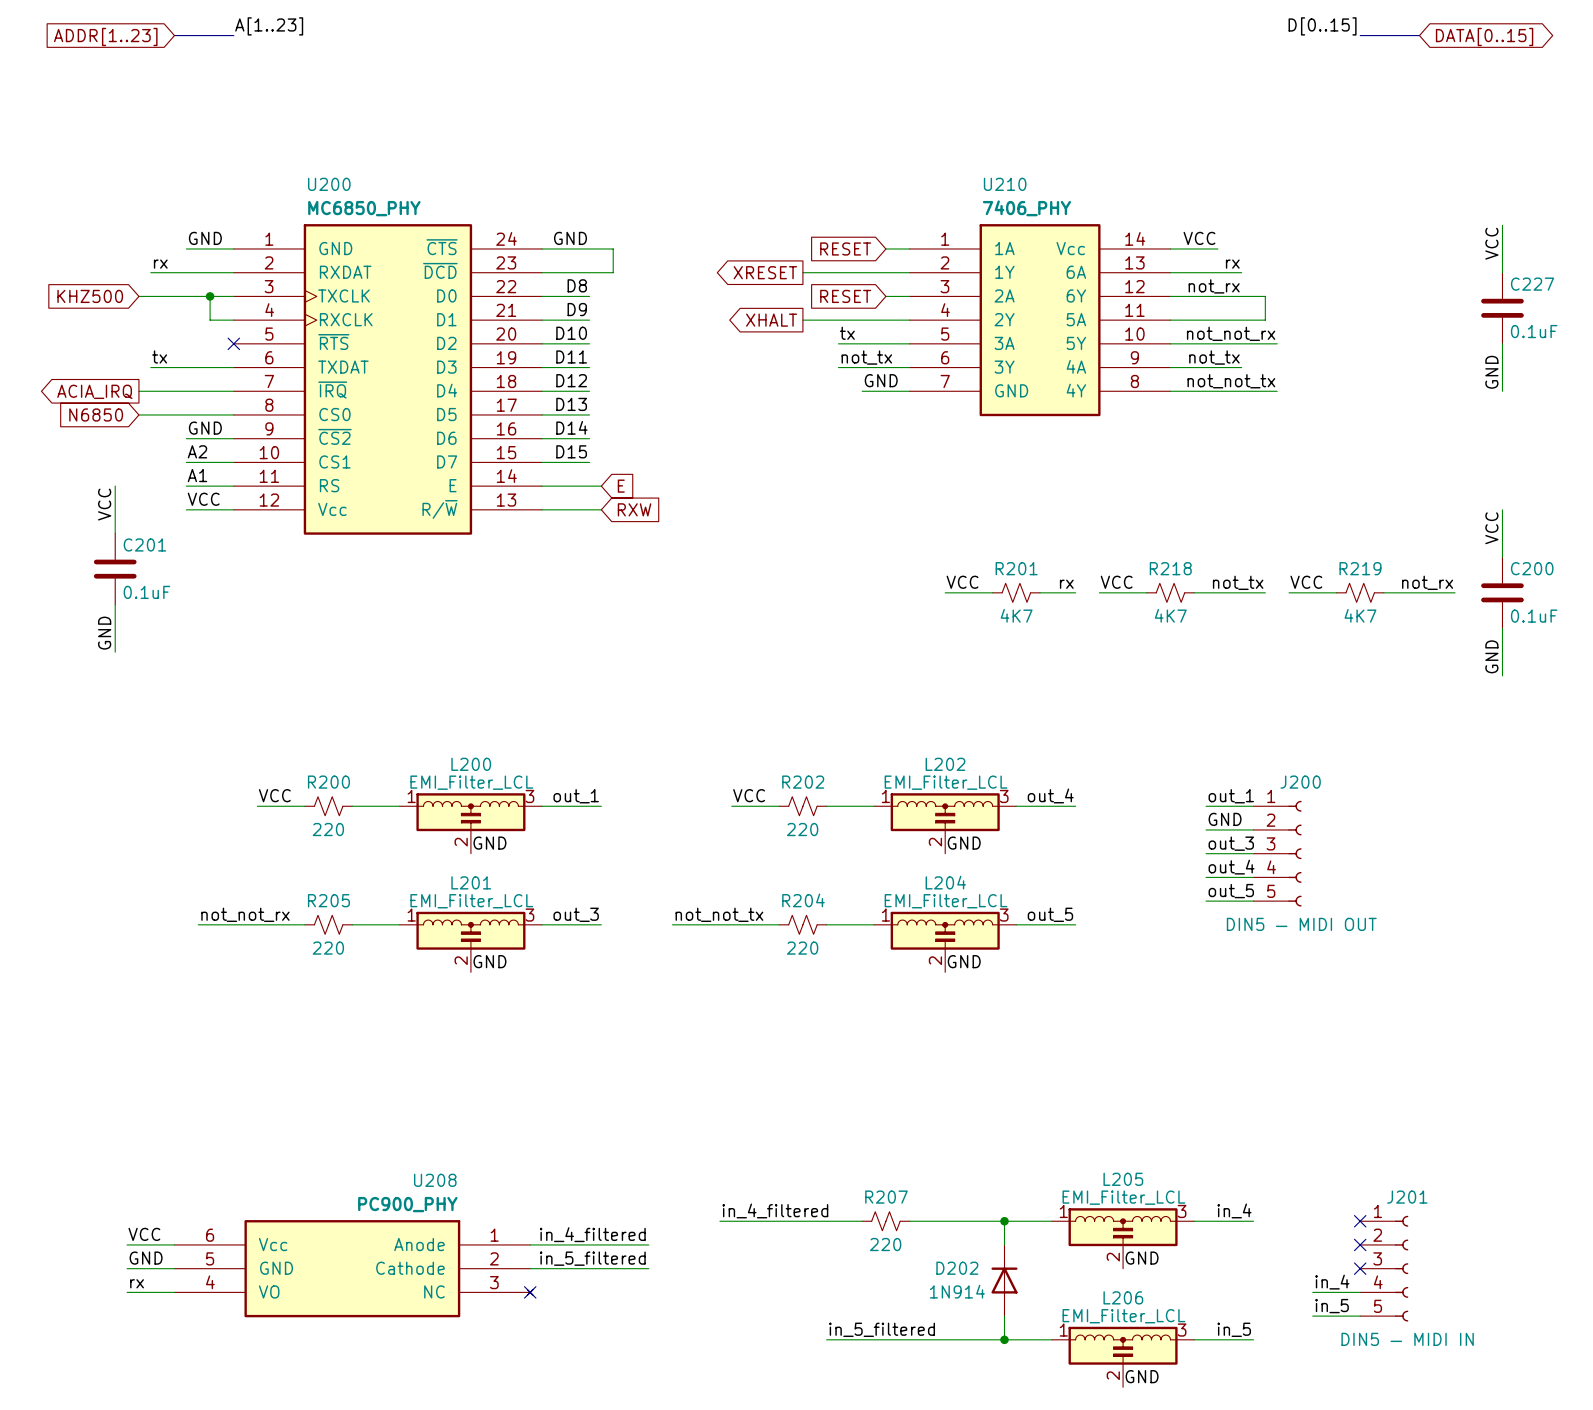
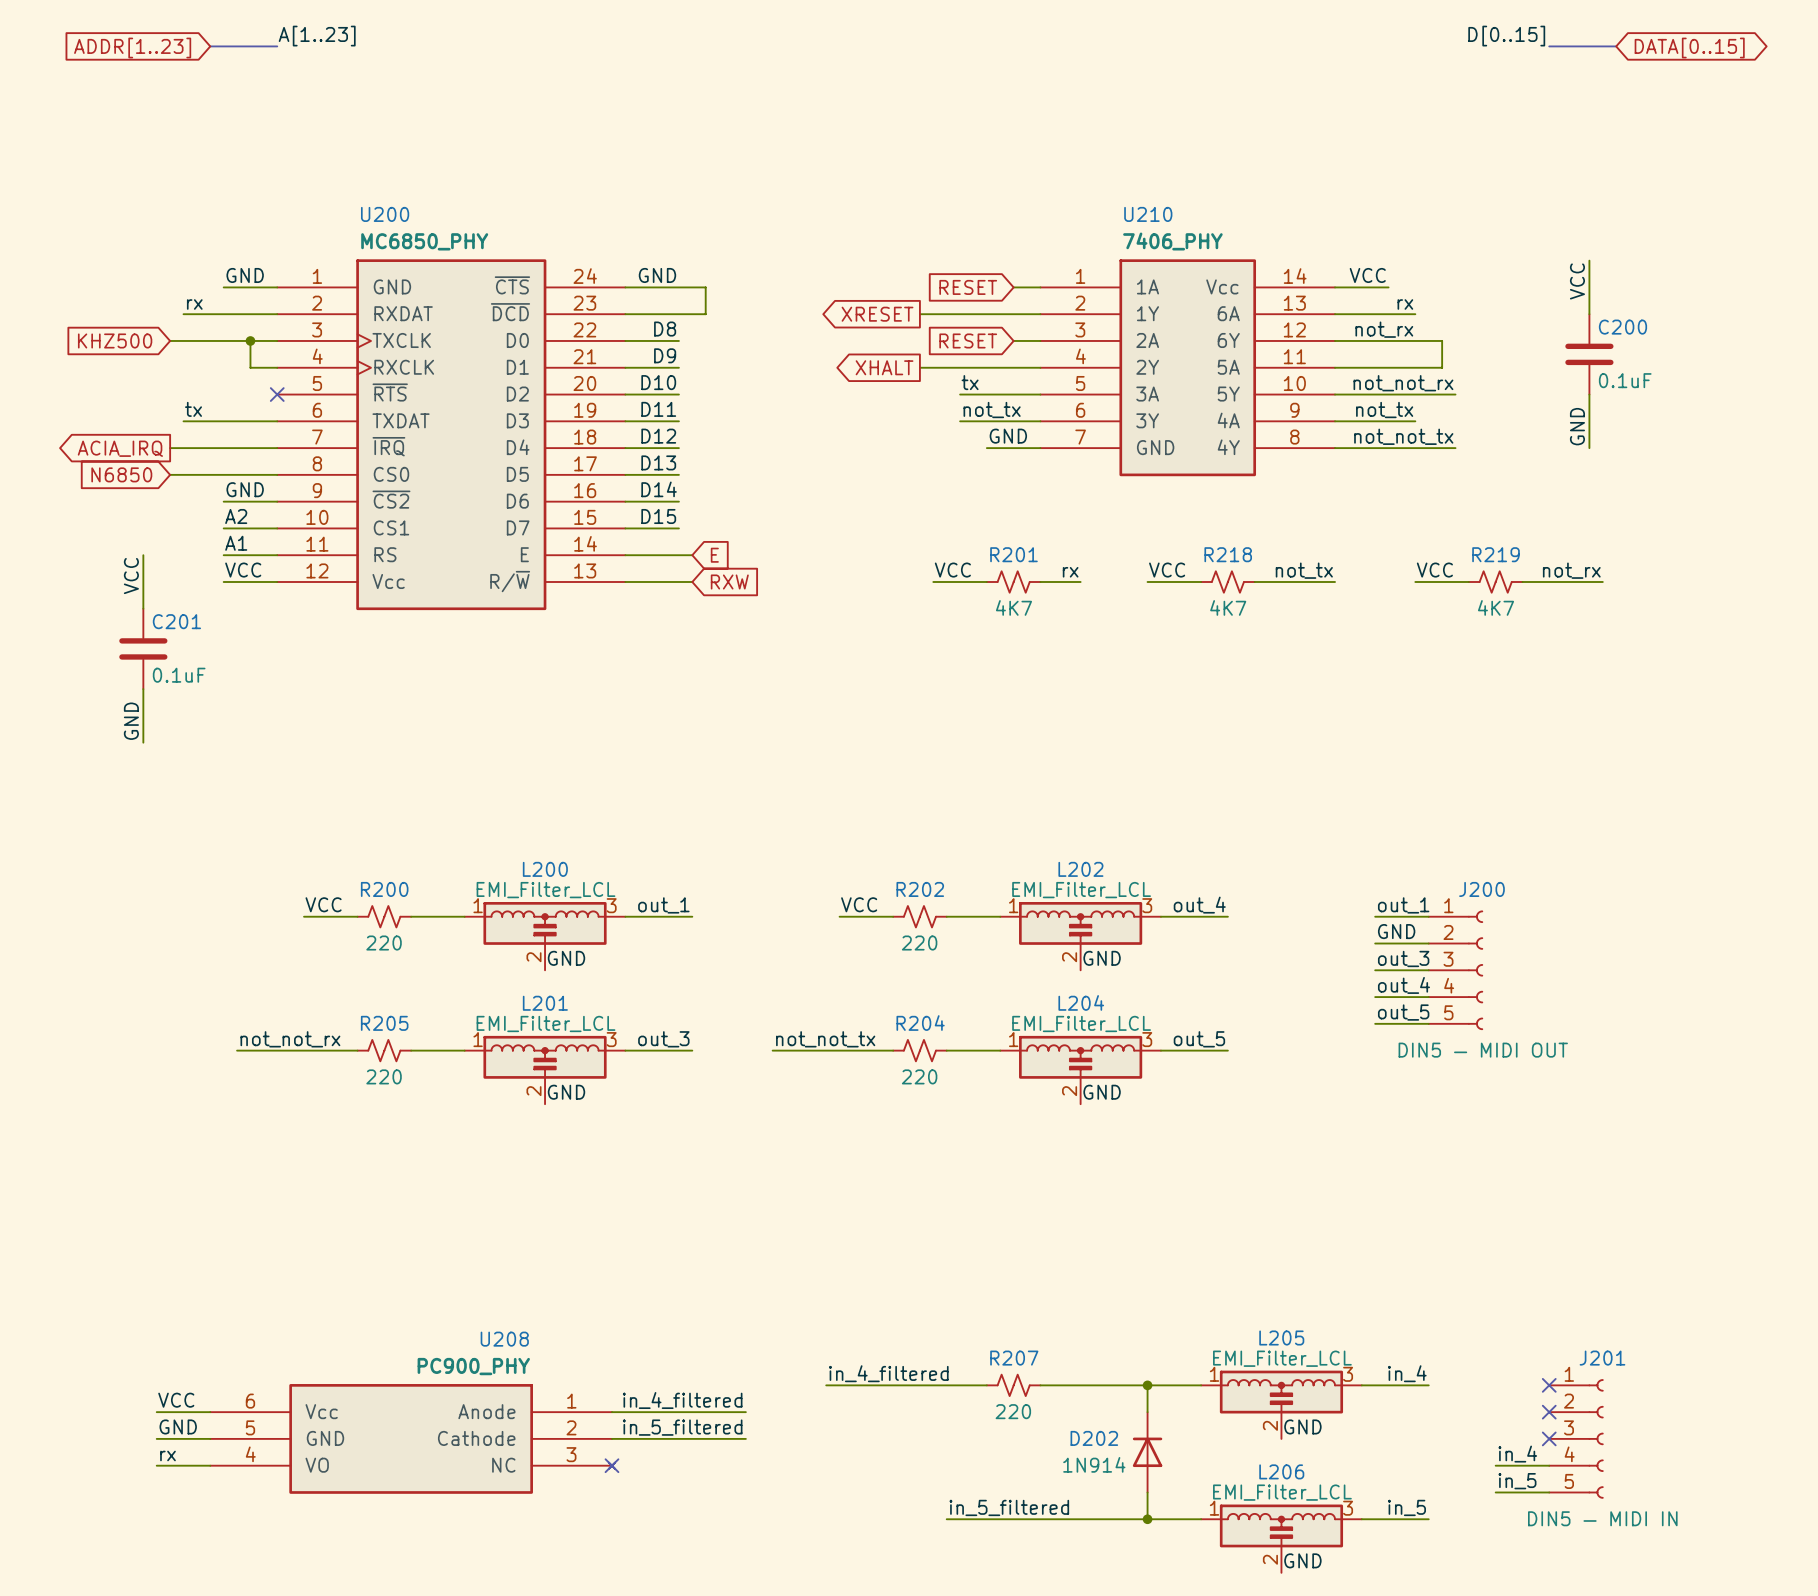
wire: (1502, 225) (1502, 272) -> (1589, 260) (1589, 314)
label position: VCC (1491, 243) -> VCC (1577, 281)
C227: 0.1uF (1502, 308) -> none
wire: (1502, 343) (1502, 391) -> (1589, 394) (1589, 448)
label position: GND (1491, 372) -> GND (1577, 426)
label: none -> VCC (952, 570)
label: none -> VCC (1167, 570)
label: none -> VCC (1434, 570)
wire: (1502, 509) (1502, 557) -> none
label: VCC (1491, 528) -> none
label: VCC (962, 582) -> none
label: VCC (1116, 582) -> none
label position: not_tx (1238, 582) -> not_tx (1304, 570)
label: VCC (1306, 582) -> none
label position: not_rx (1427, 582) -> not_rx (1571, 570)
label position: rx (1066, 584) -> rx (1070, 572)
wire: (945, 592) (992, 592) -> (933, 581) (986, 581)
R201 position: (1016, 592) -> (1013, 581)
wire: (1040, 592) (1075, 592) -> (1040, 581) (1080, 581)
wire: (1099, 592) (1146, 592) -> (1147, 581) (1201, 581)
R218 position: (1170, 592) -> (1227, 581)
wire: (1194, 592) (1265, 592) -> (1254, 581) (1335, 581)
wire: (1289, 592) (1336, 592) -> (1415, 581) (1468, 581)
R219 position: (1360, 592) -> (1495, 581)
wire: (1383, 592) (1455, 592) -> (1522, 581) (1602, 581)
C200 position: (1502, 592) -> (1589, 354)
wire: (1502, 628) (1502, 675) -> none
label: GND (1491, 656) -> none

